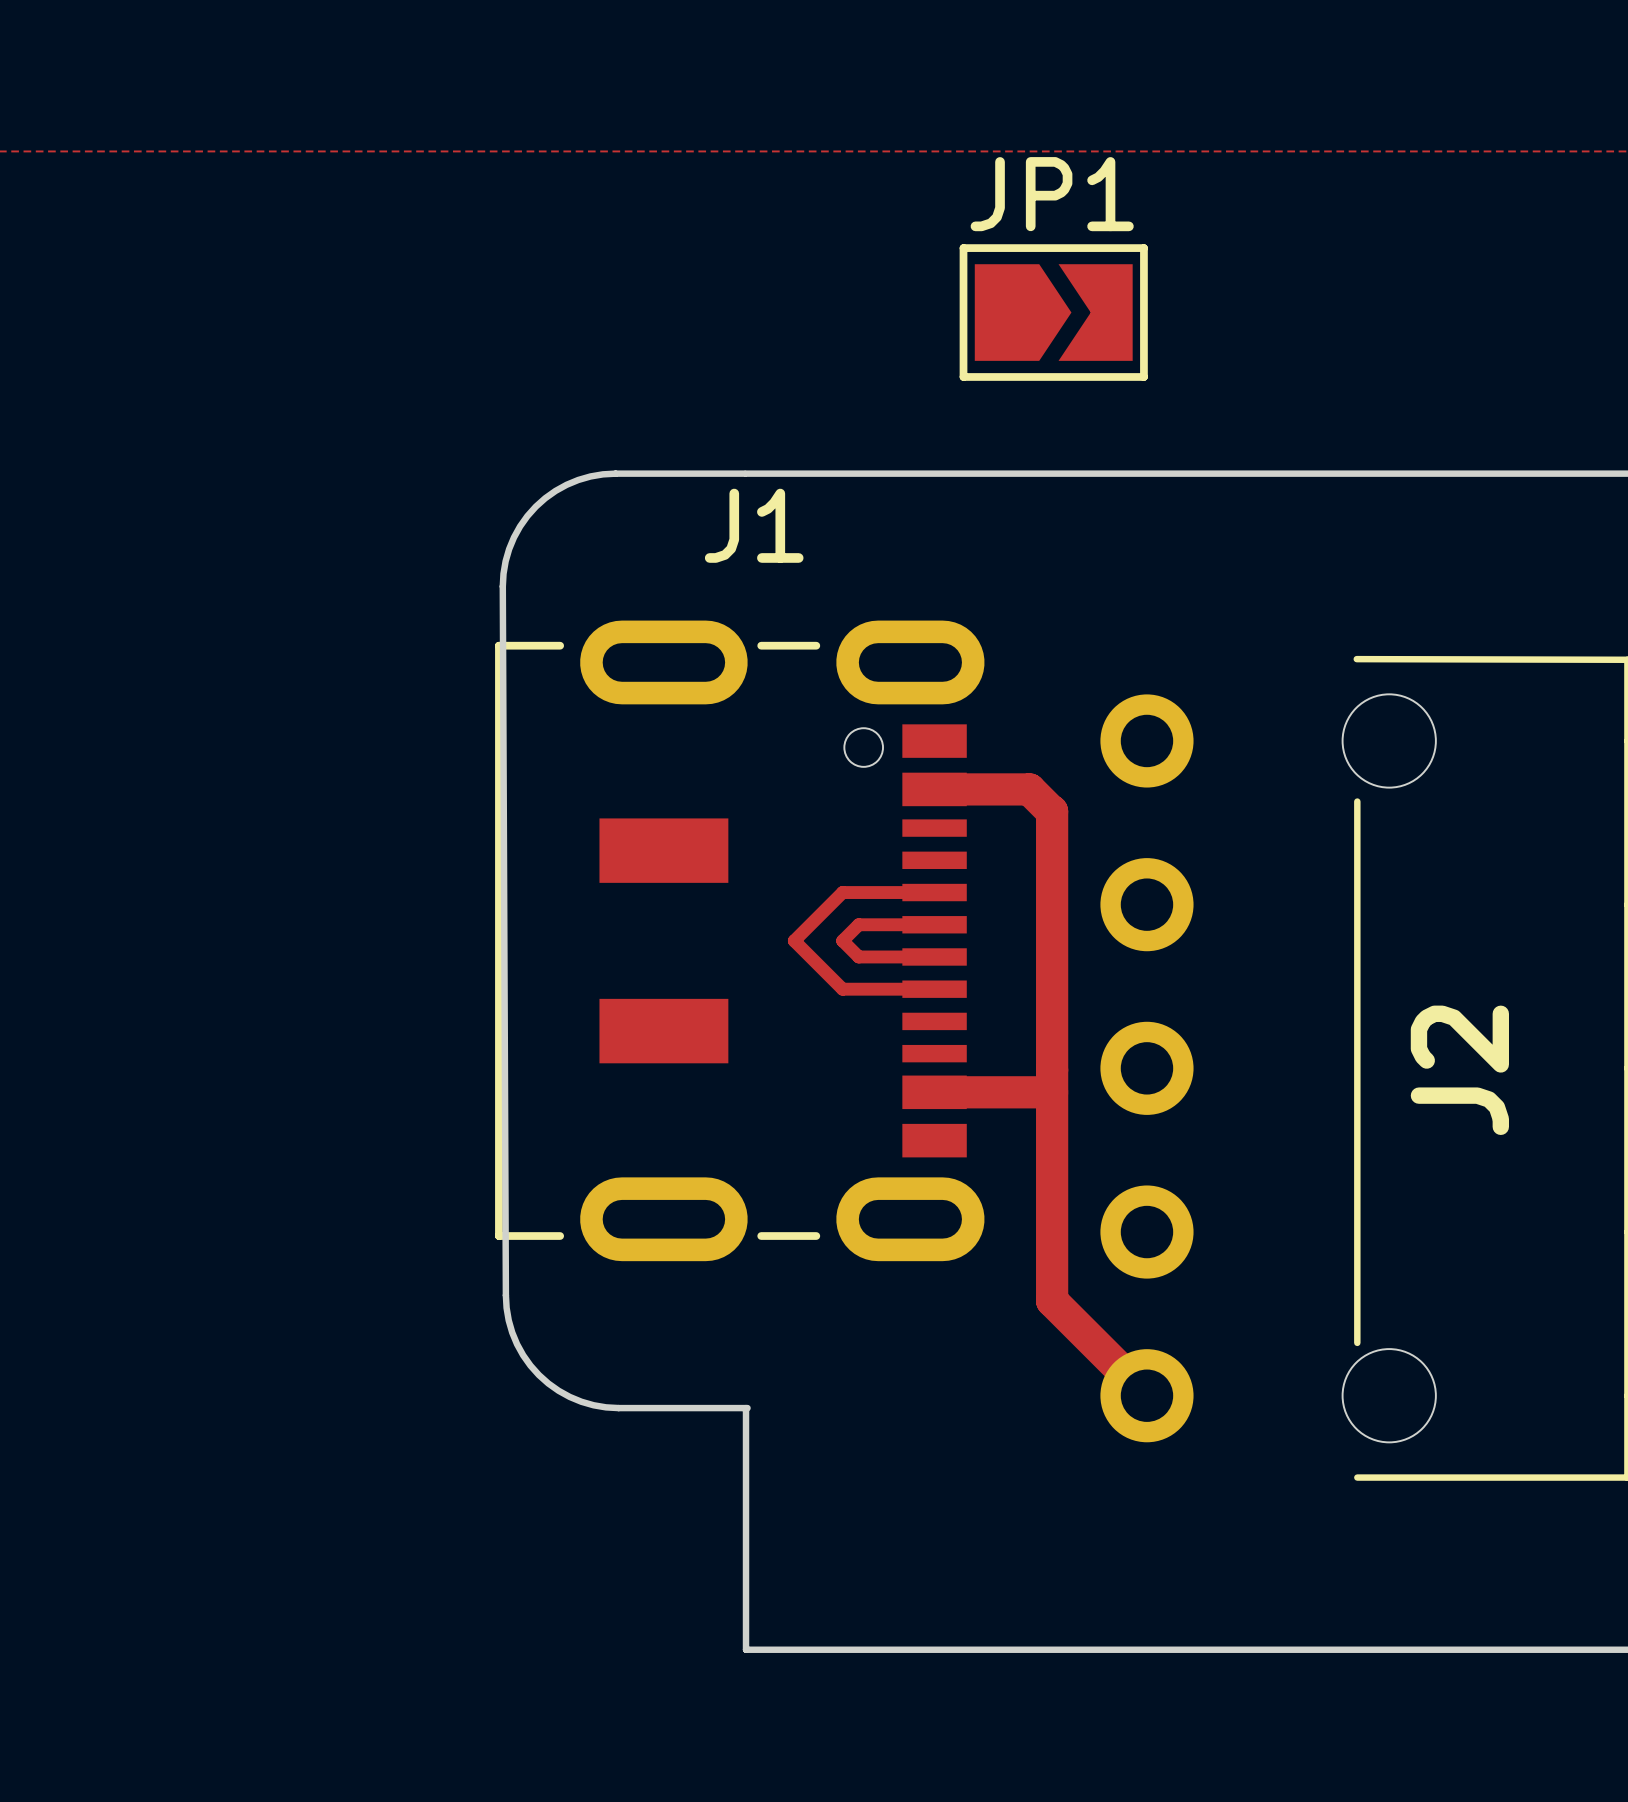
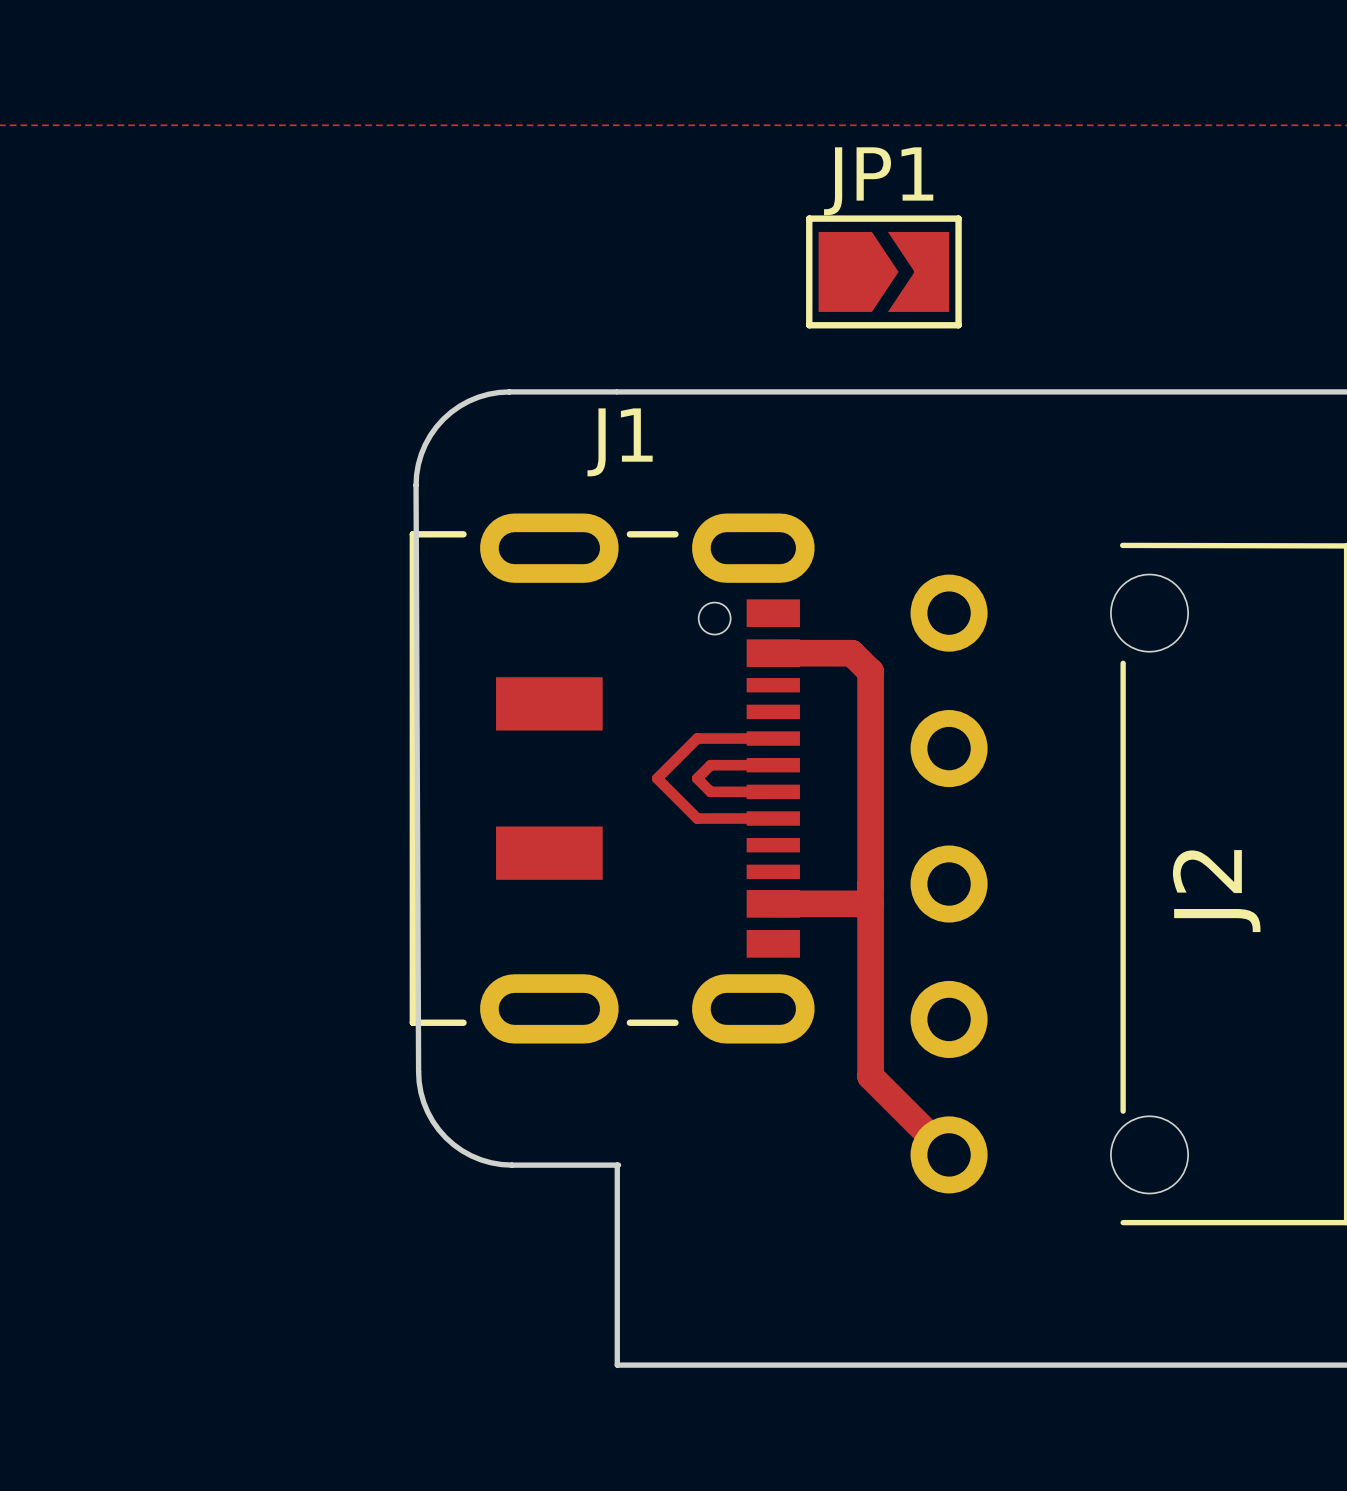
JP1 position: (1053, 312) -> (883, 271)

